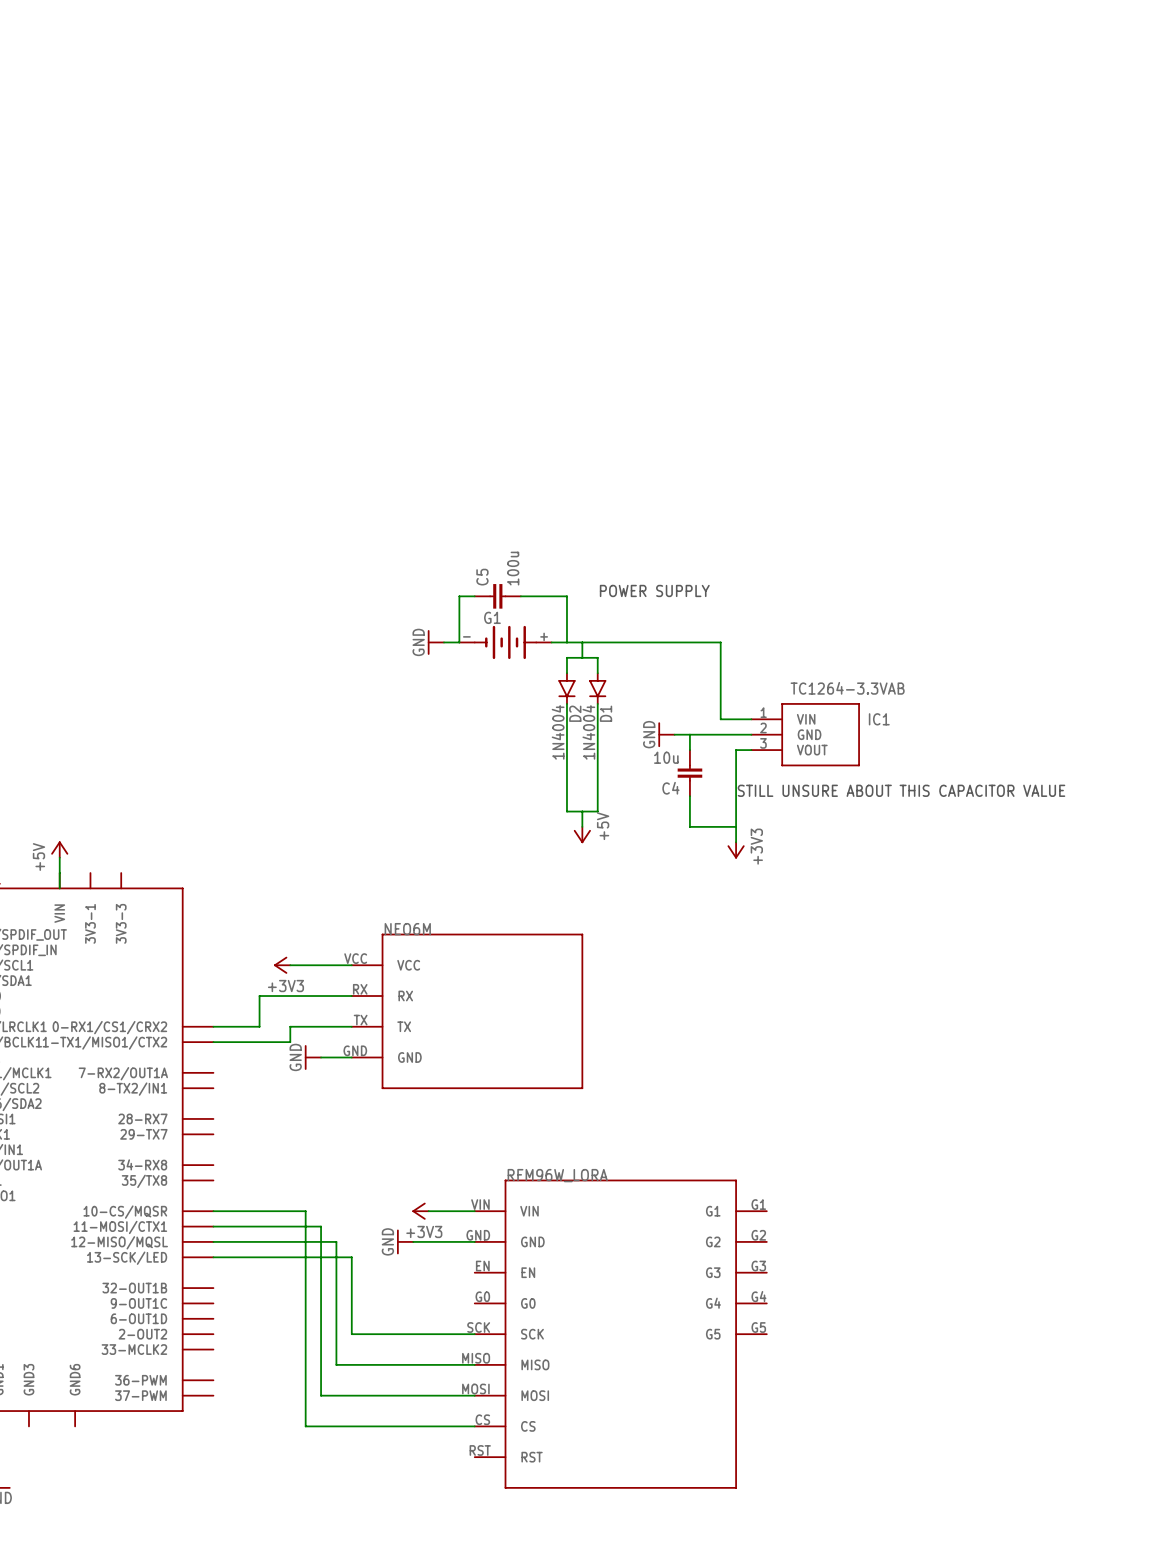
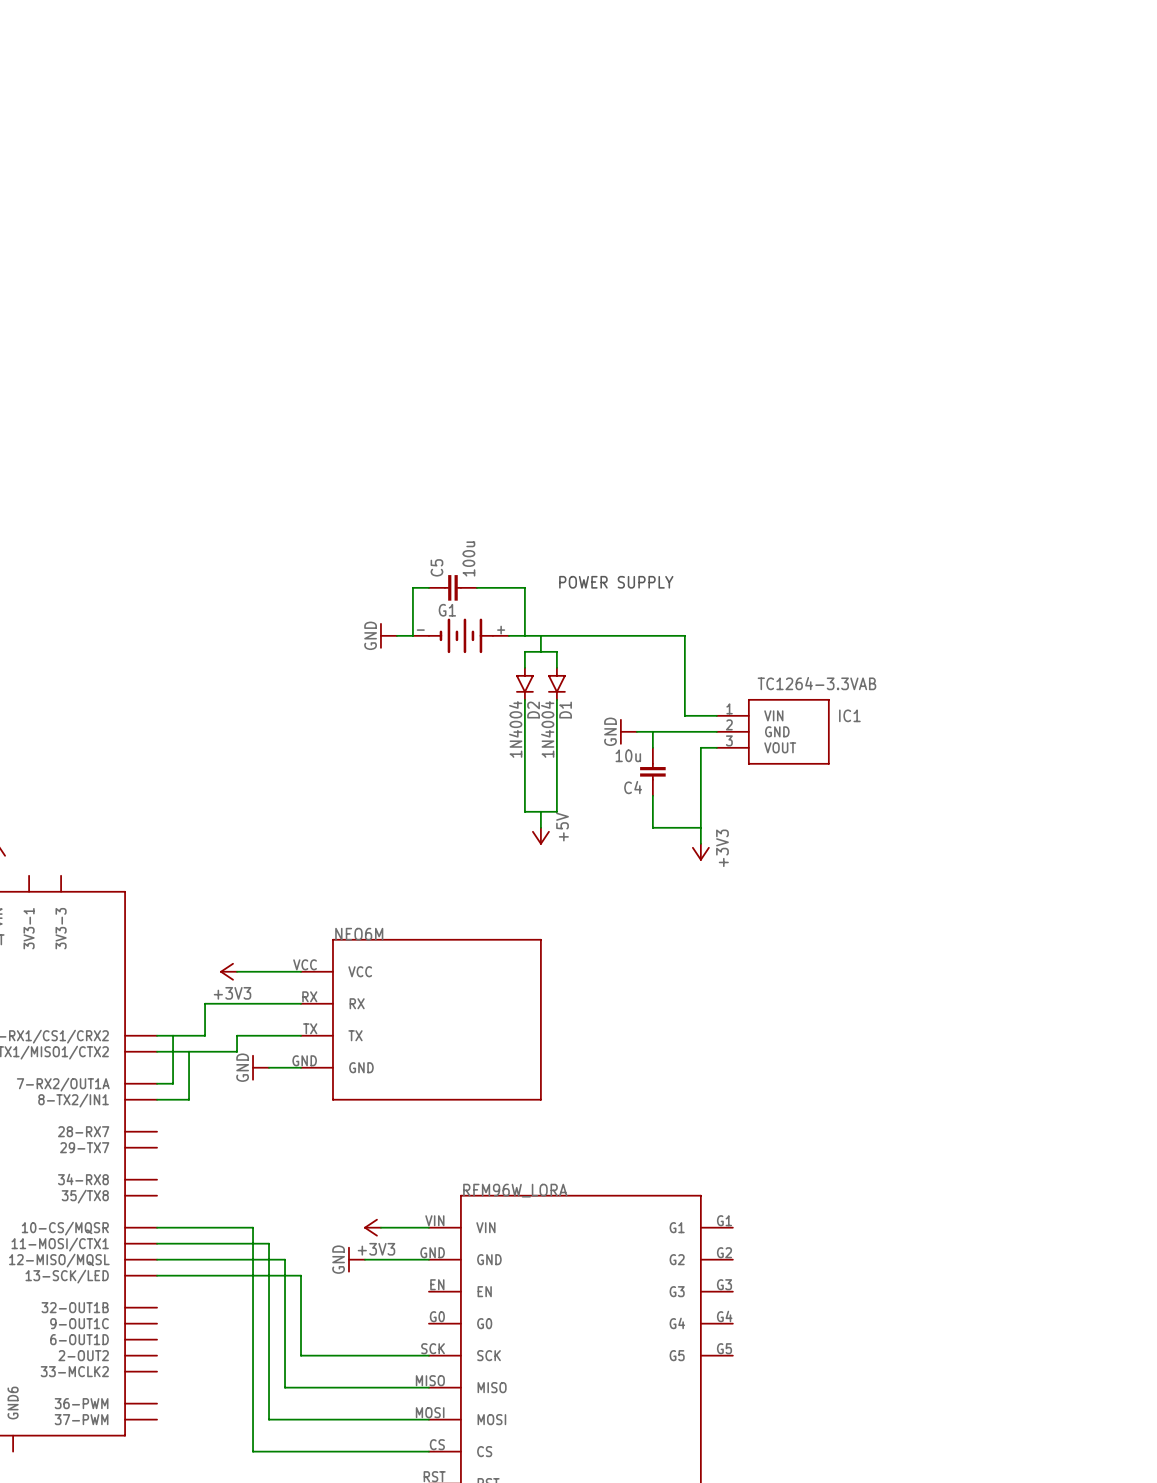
text: STILL UNSURE ABOUT THIS CAPACITOR VALUE (901, 790) -> none
wire: none -> (173, 1035) (173, 1083) (157, 1083)
wire: none -> (189, 1051) (189, 1099) (157, 1099)

